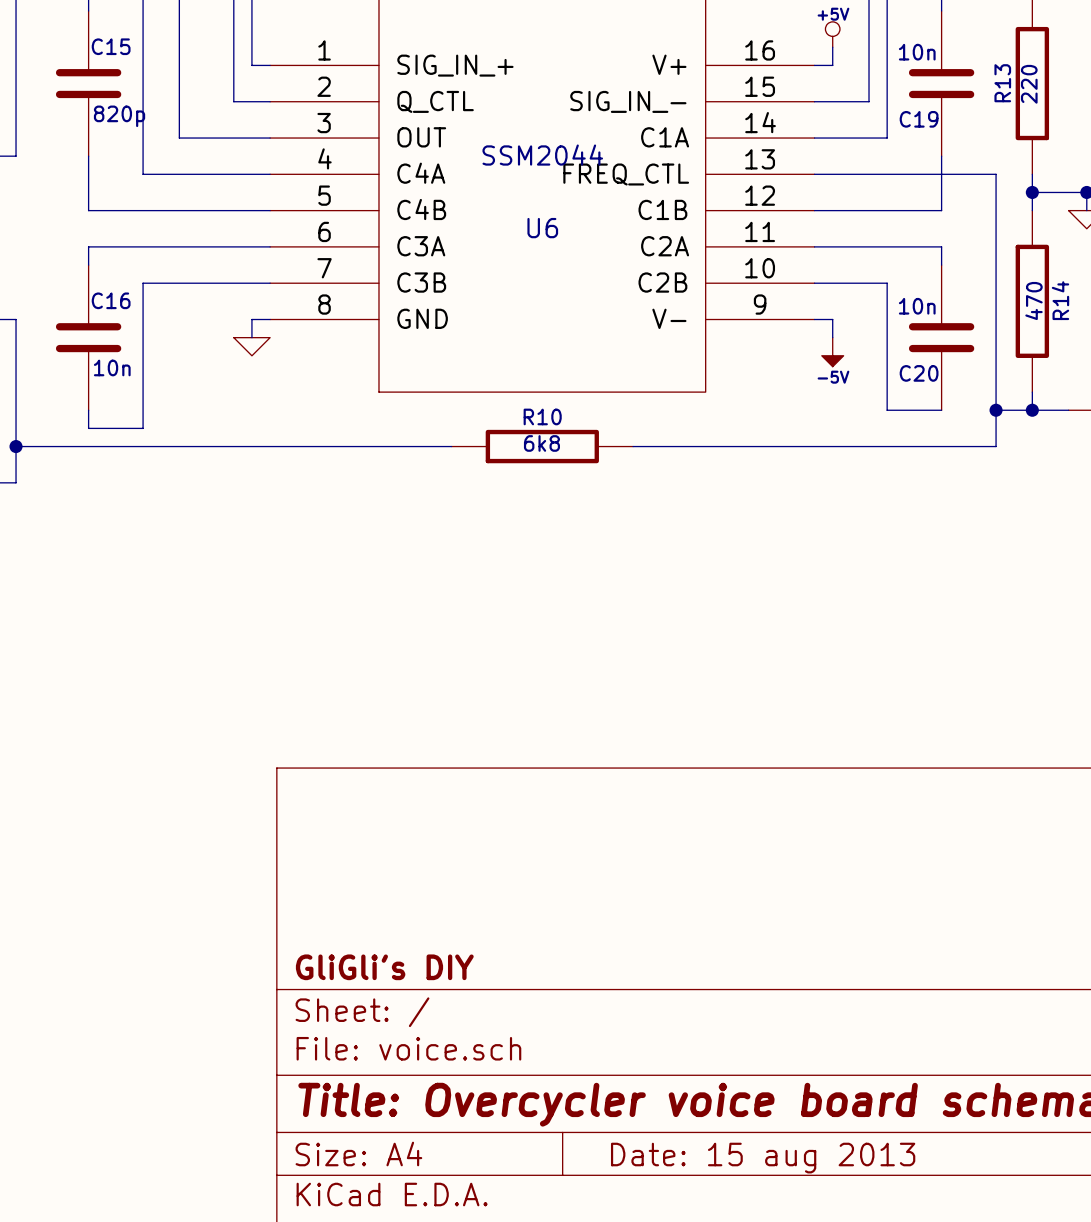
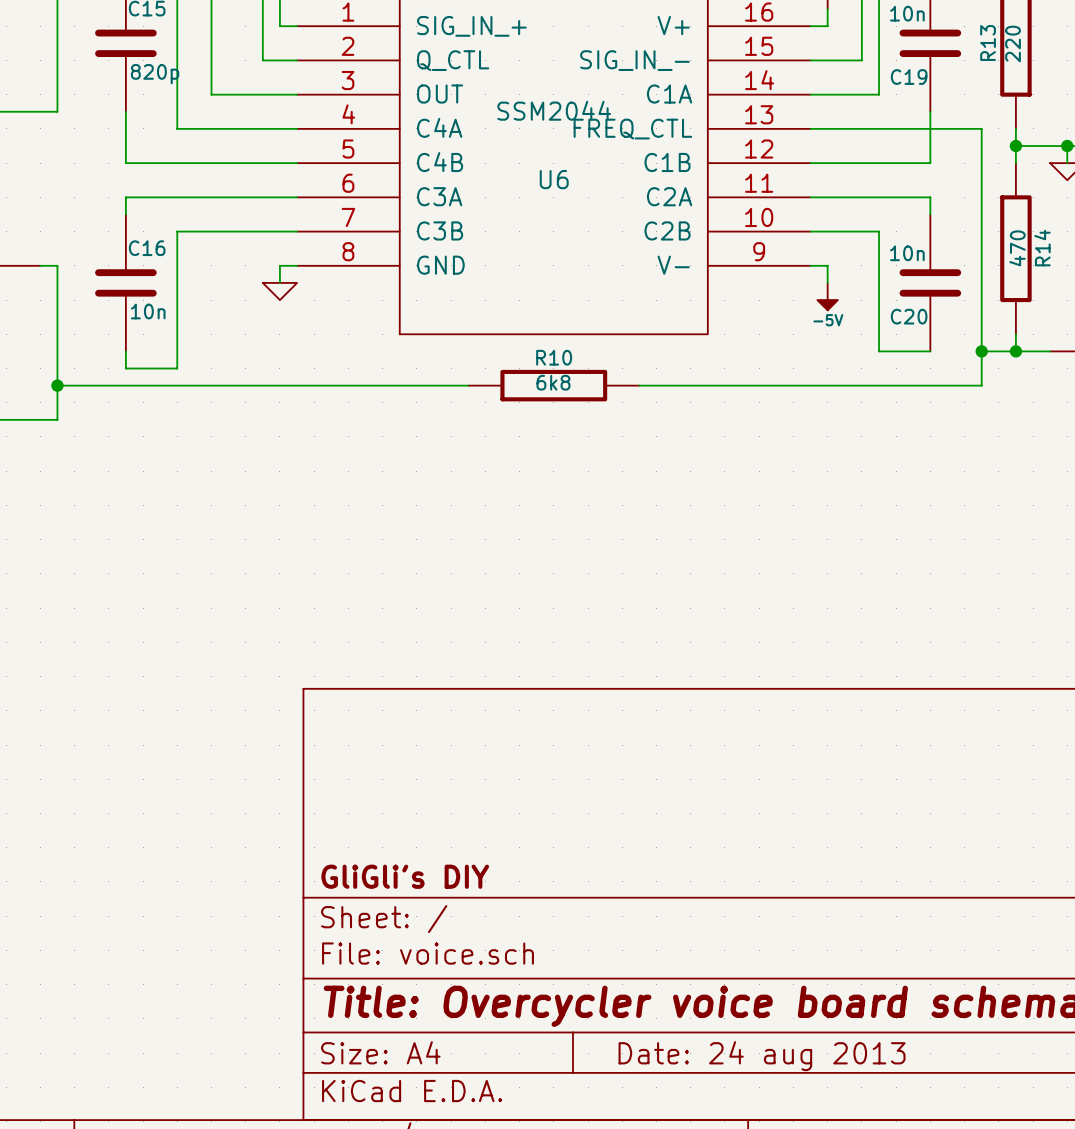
title block: Date: 15 aug 2013 (763, 1158) -> Date: 24 aug 2013 (762, 1056)

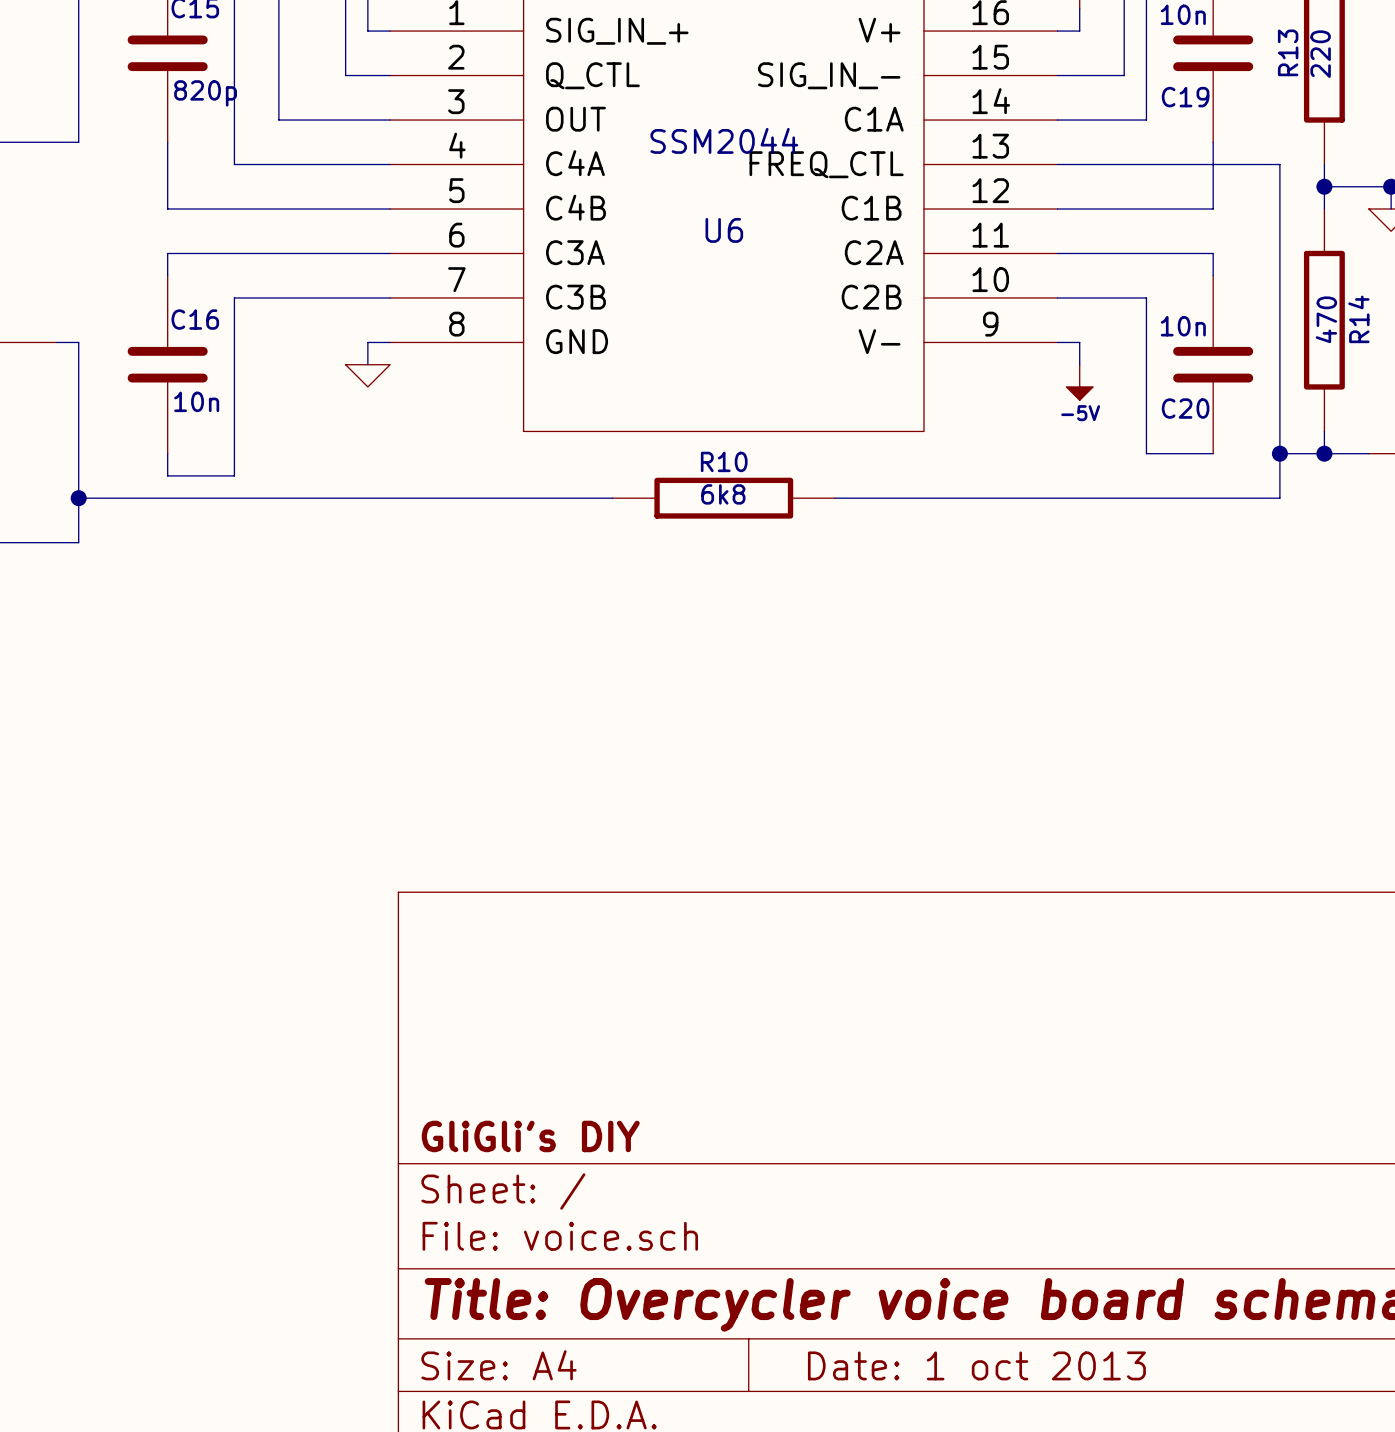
title block: Date: 24 aug 2013 (762, 1056) -> Date: 1 oct 2013 (976, 1365)

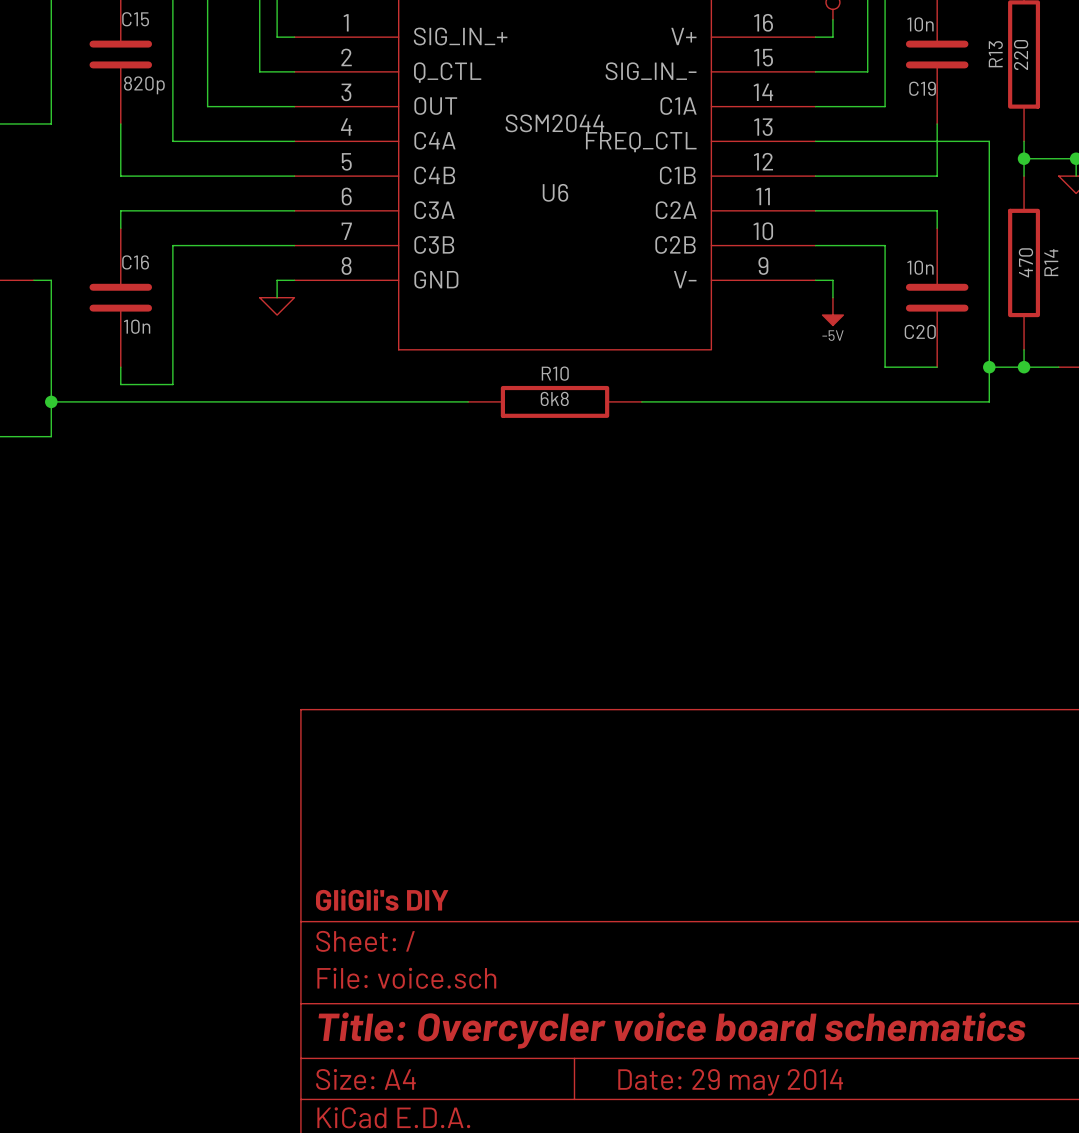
title block: Date: 1 oct 2013 (976, 1365) -> Date: 29 may 2014 (730, 1082)

